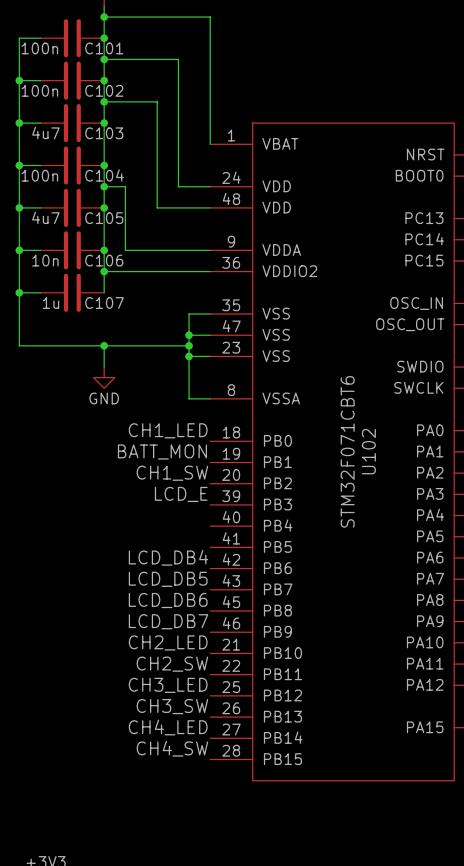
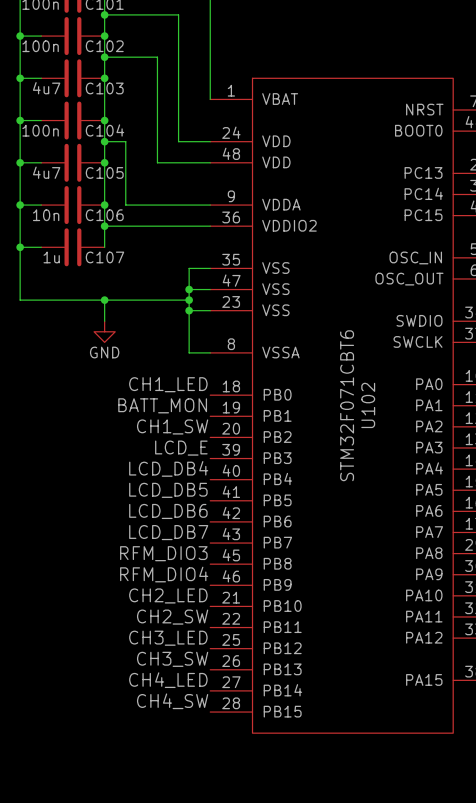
label: none -> LCD_DB4 (168, 468)
label: none -> LCD_DB5 (168, 490)
label: LCD_DB4 (168, 557) -> LCD_DB6 (168, 511)
label: LCD_DB5 (168, 579) -> LCD_DB7 (168, 532)
label: LCD_DB6 (168, 600) -> RFM_DIO3 (163, 553)
label: LCD_DB7 (168, 621) -> RFM_DIO4 (164, 574)

